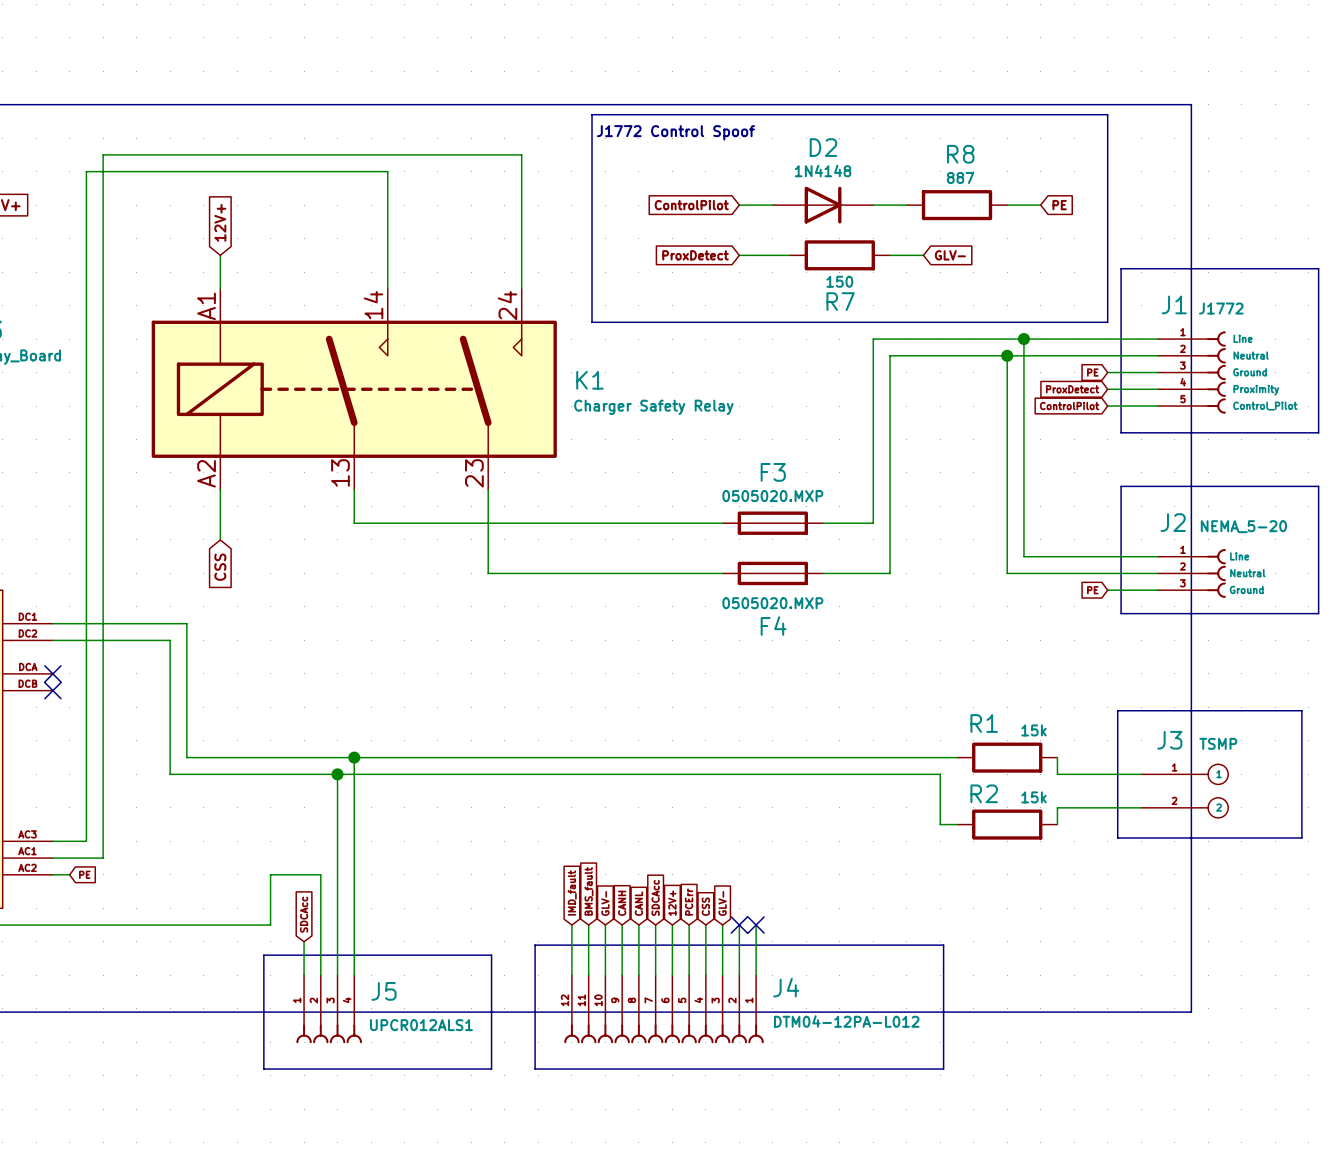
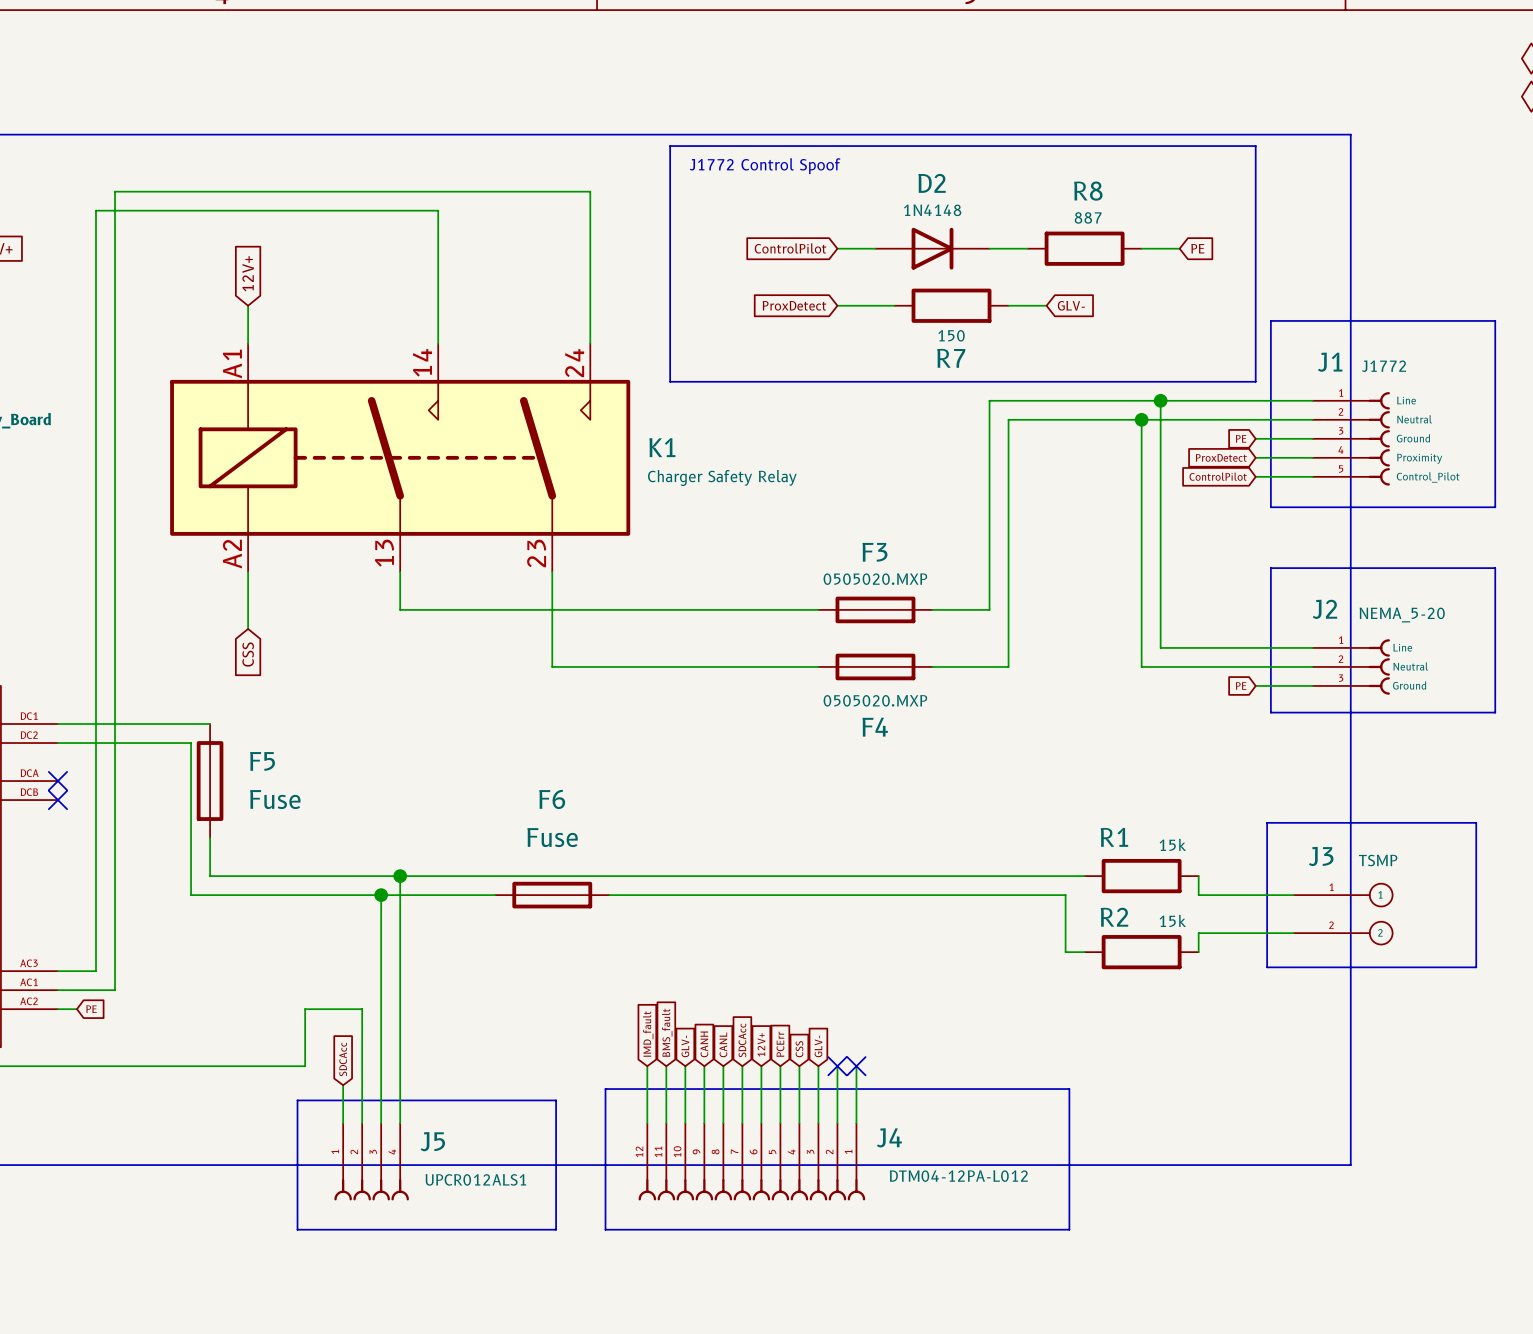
F5: none -> Fuse (210, 781)
F6: none -> Fuse (552, 895)

